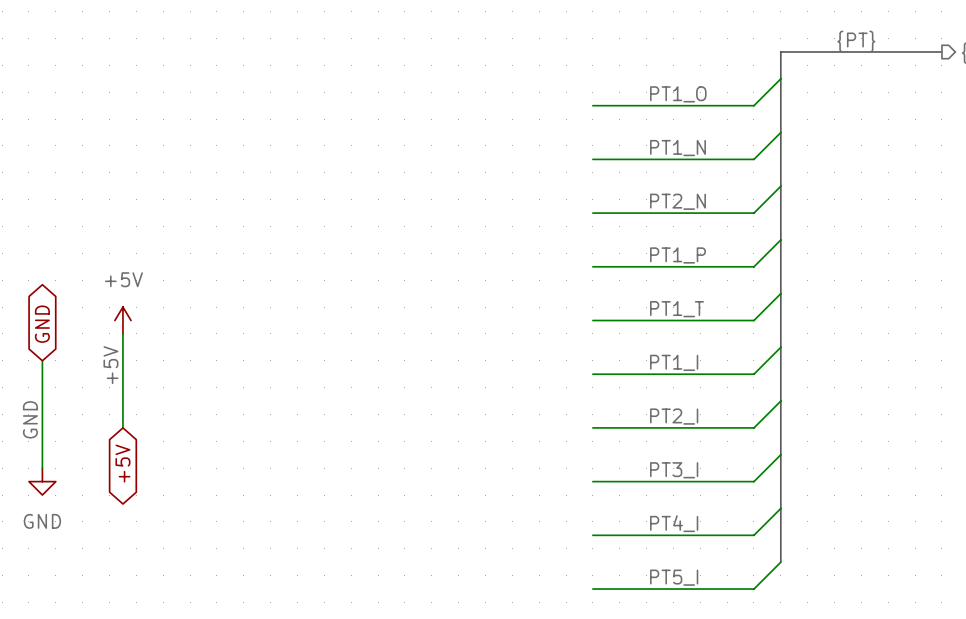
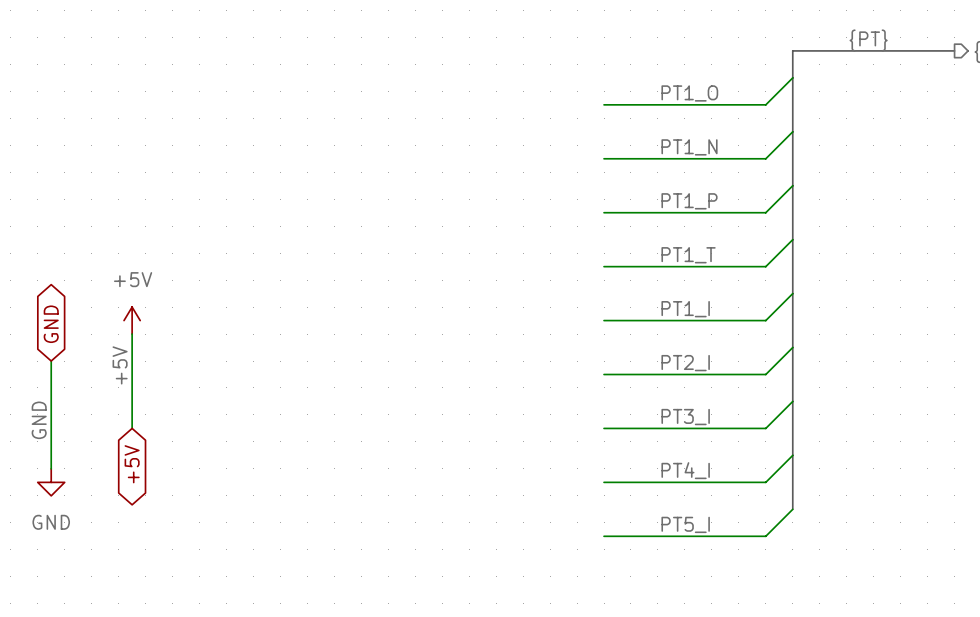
label: PT2_N (677, 201) -> PT1_P (689, 201)
label: PT1_P (677, 255) -> PT1_T (688, 255)
label: PT1_T (677, 309) -> PT1_I (685, 309)
label: PT1_I (674, 362) -> PT2_I (685, 363)
label: PT2_I (674, 416) -> PT3_I (685, 417)
label: PT3_I (674, 470) -> PT4_I (685, 470)
bus: (780, 508) (780, 562) -> none
label: PT4_I (674, 523) -> PT5_I (685, 524)
wire: (780, 562) (753, 589) (592, 589) -> none
label: PT5_I (674, 577) -> none

